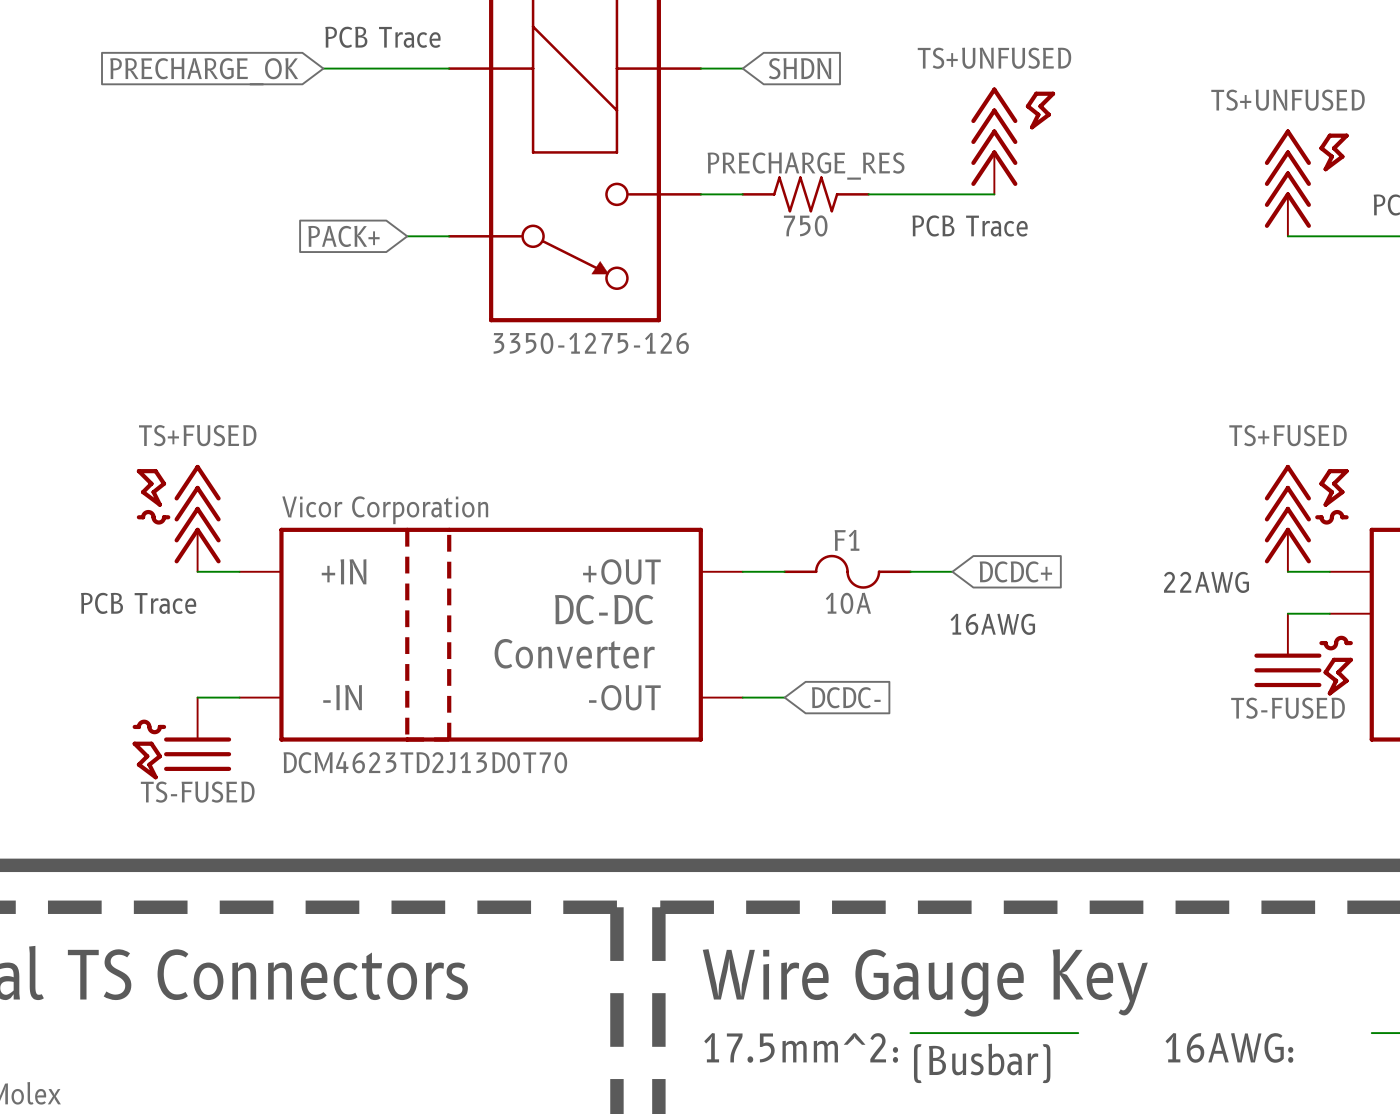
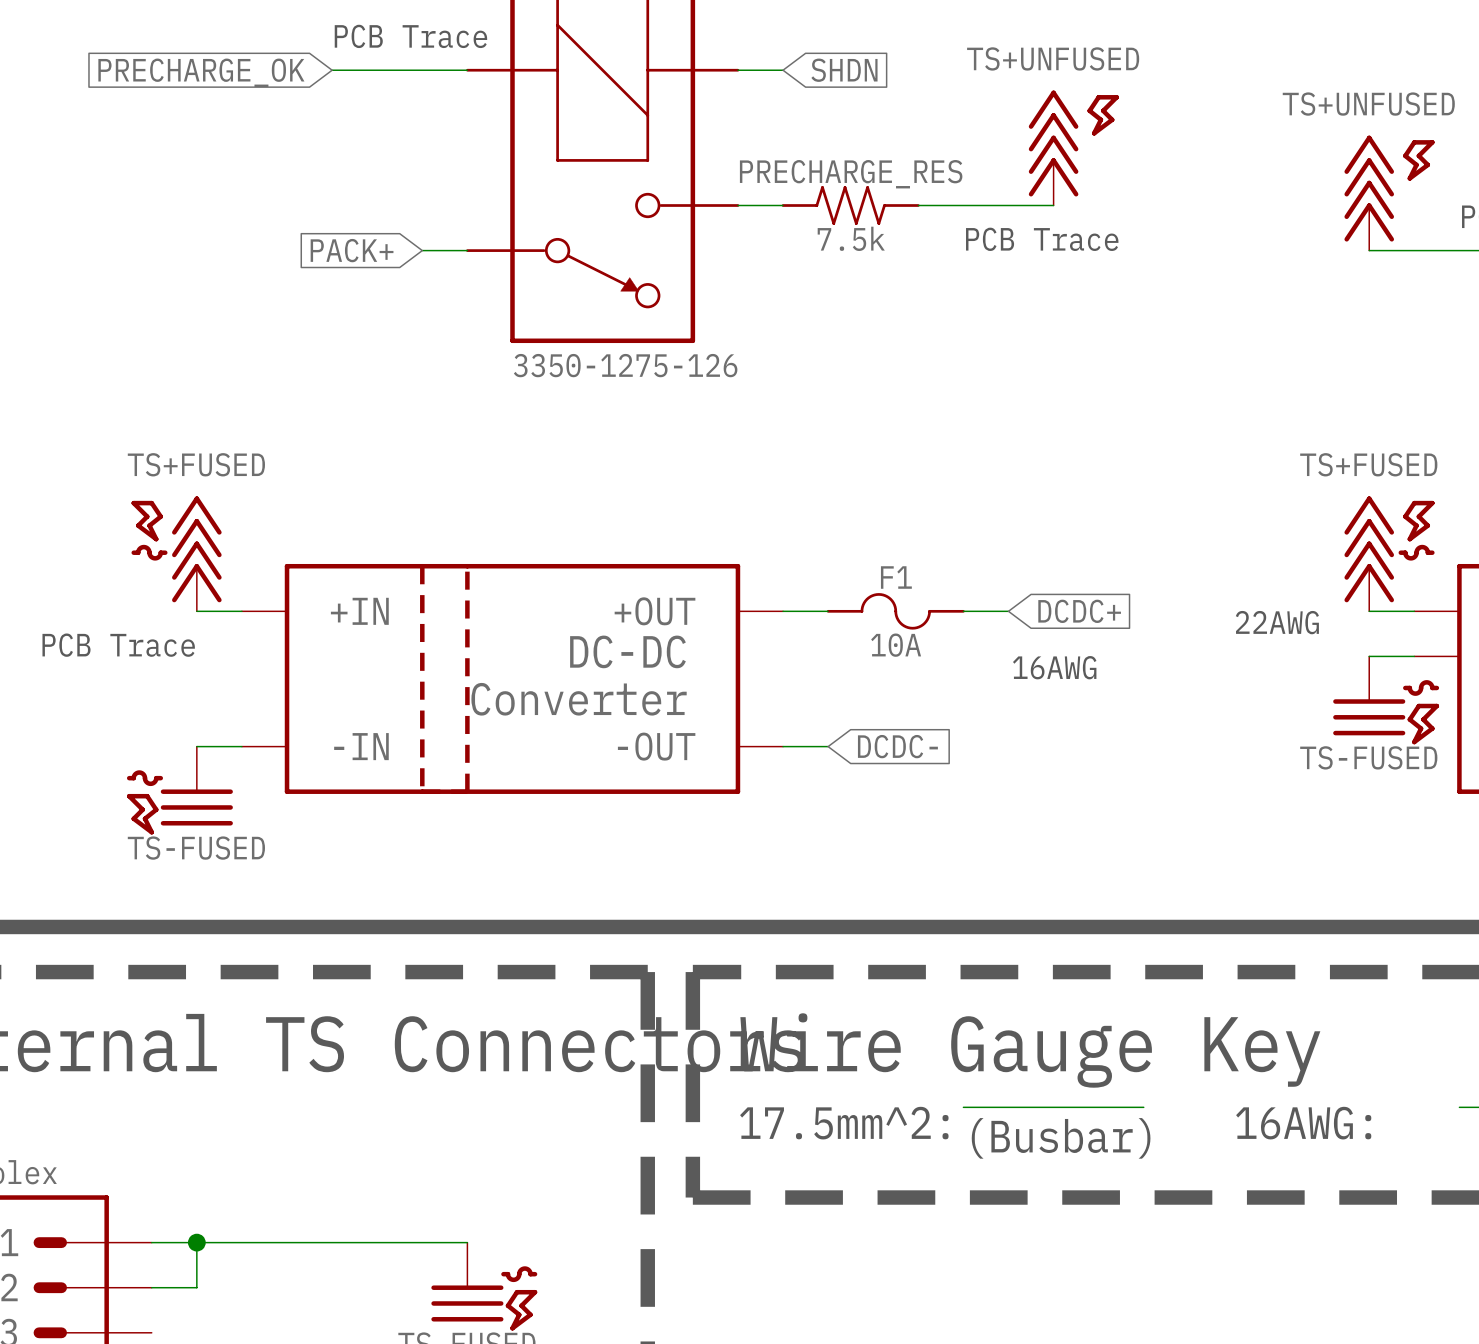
PRECHARGE_RES value: 750 (805, 225) -> 7.5k (851, 238)
part text: Vicor Corporation (385, 510) -> none
part text: DCM4623TD2J13D0T70 (425, 762) -> none

